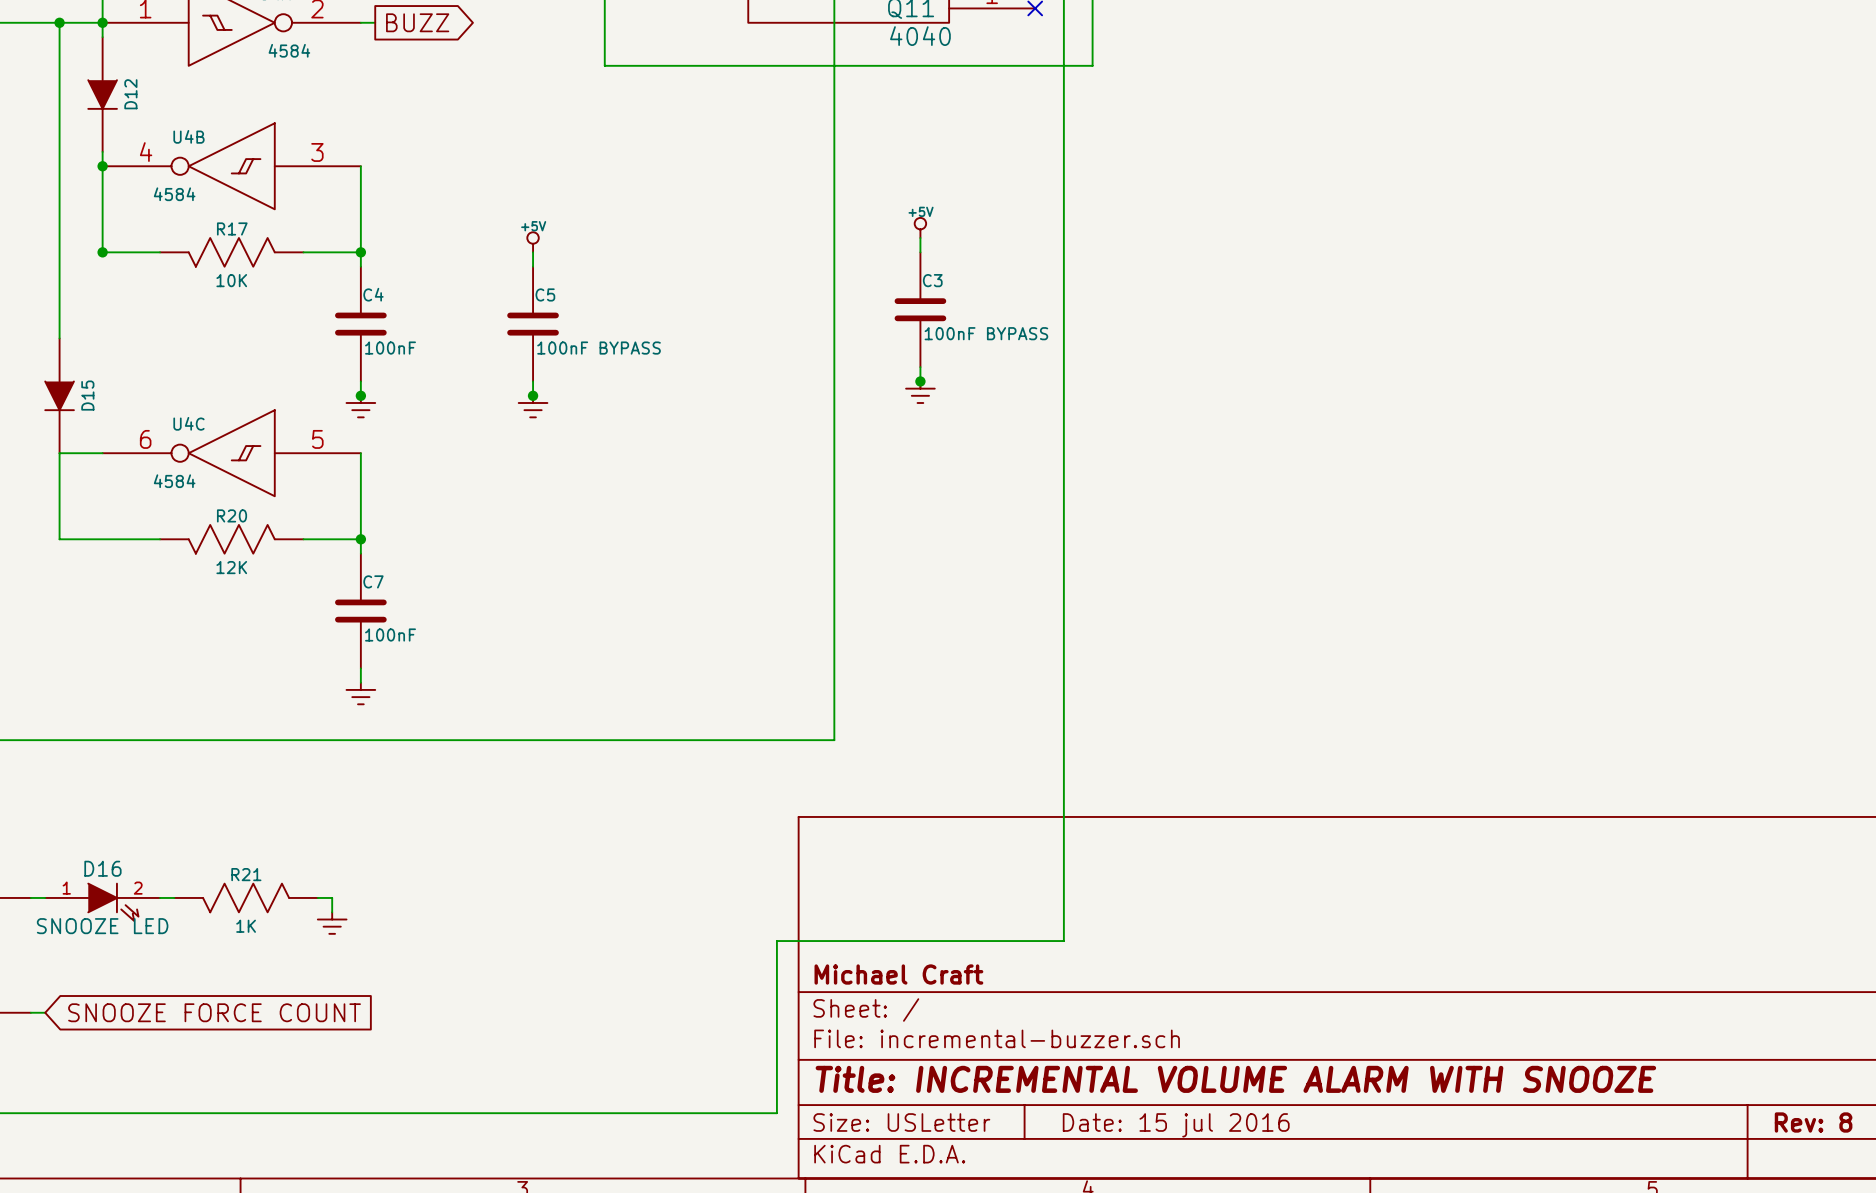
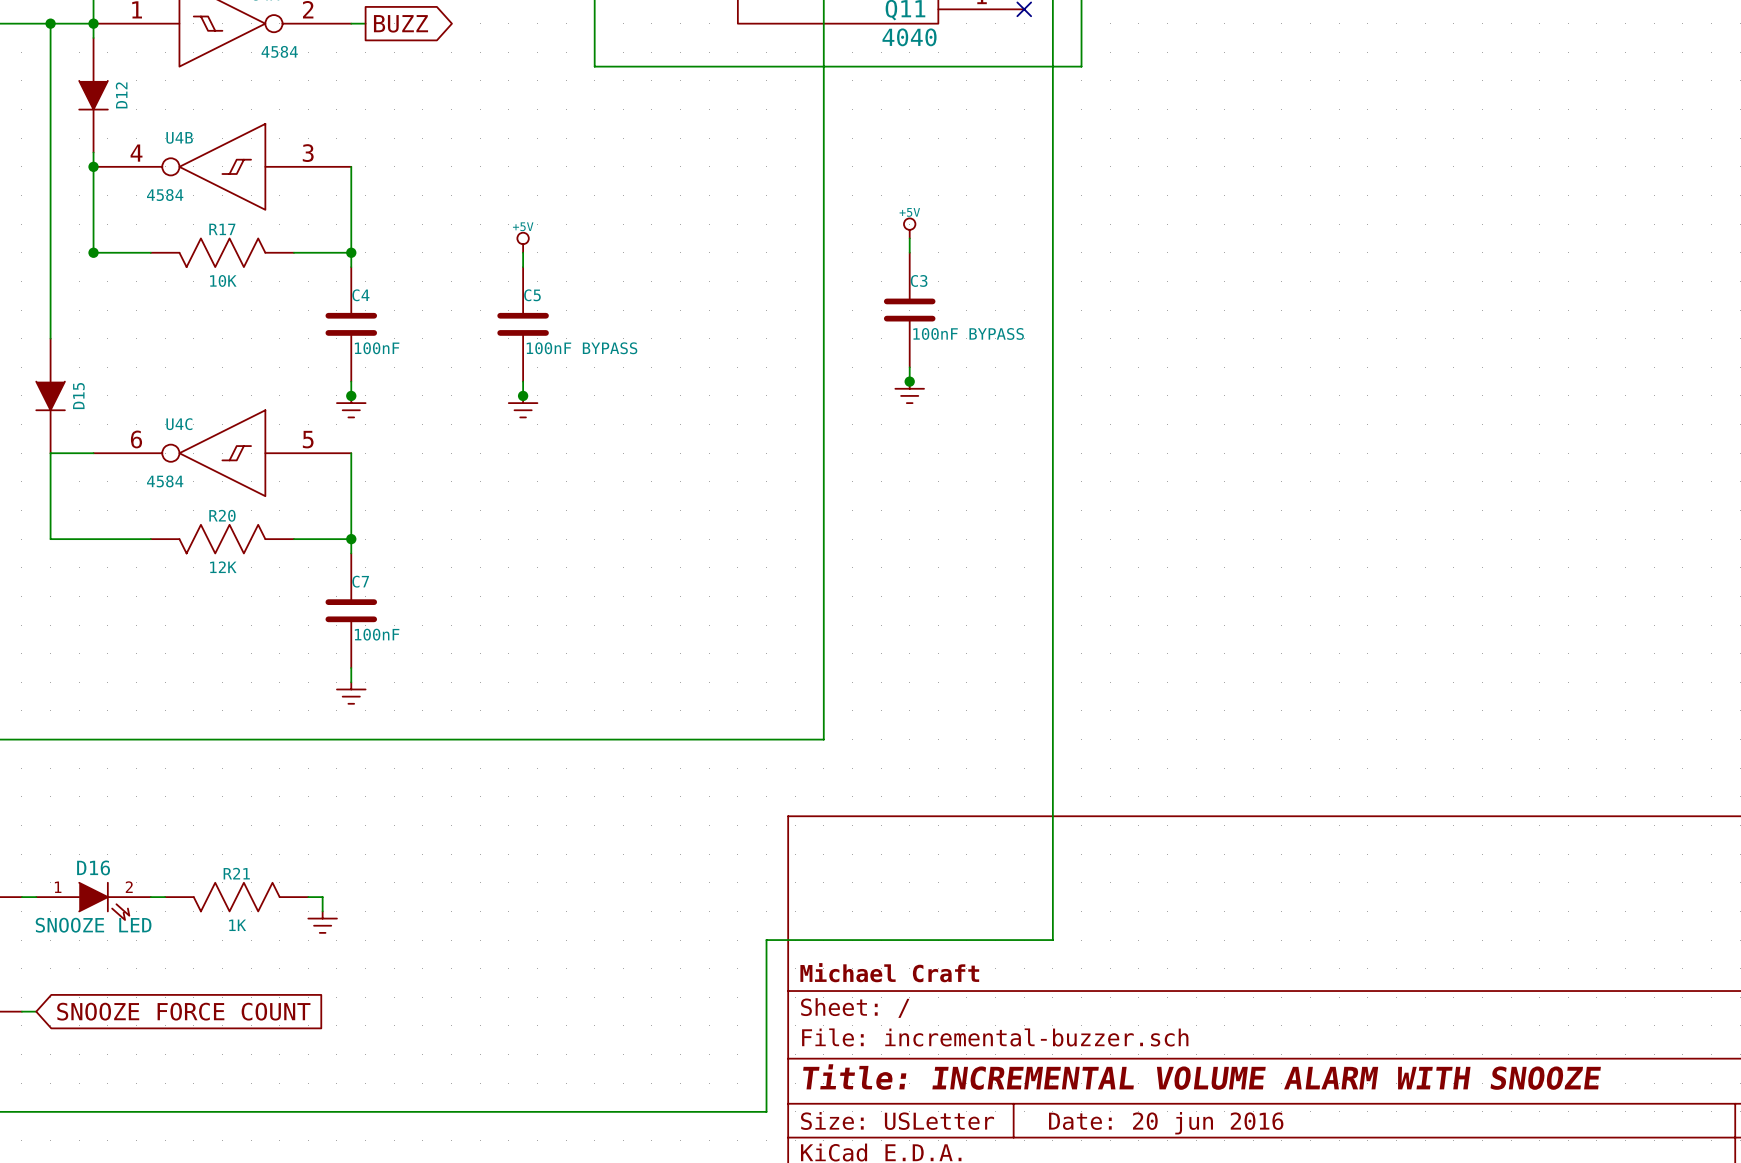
title block: Date: 15 jul 2016 (1176, 1125) -> Date: 20 jun 2016 (1166, 1123)

